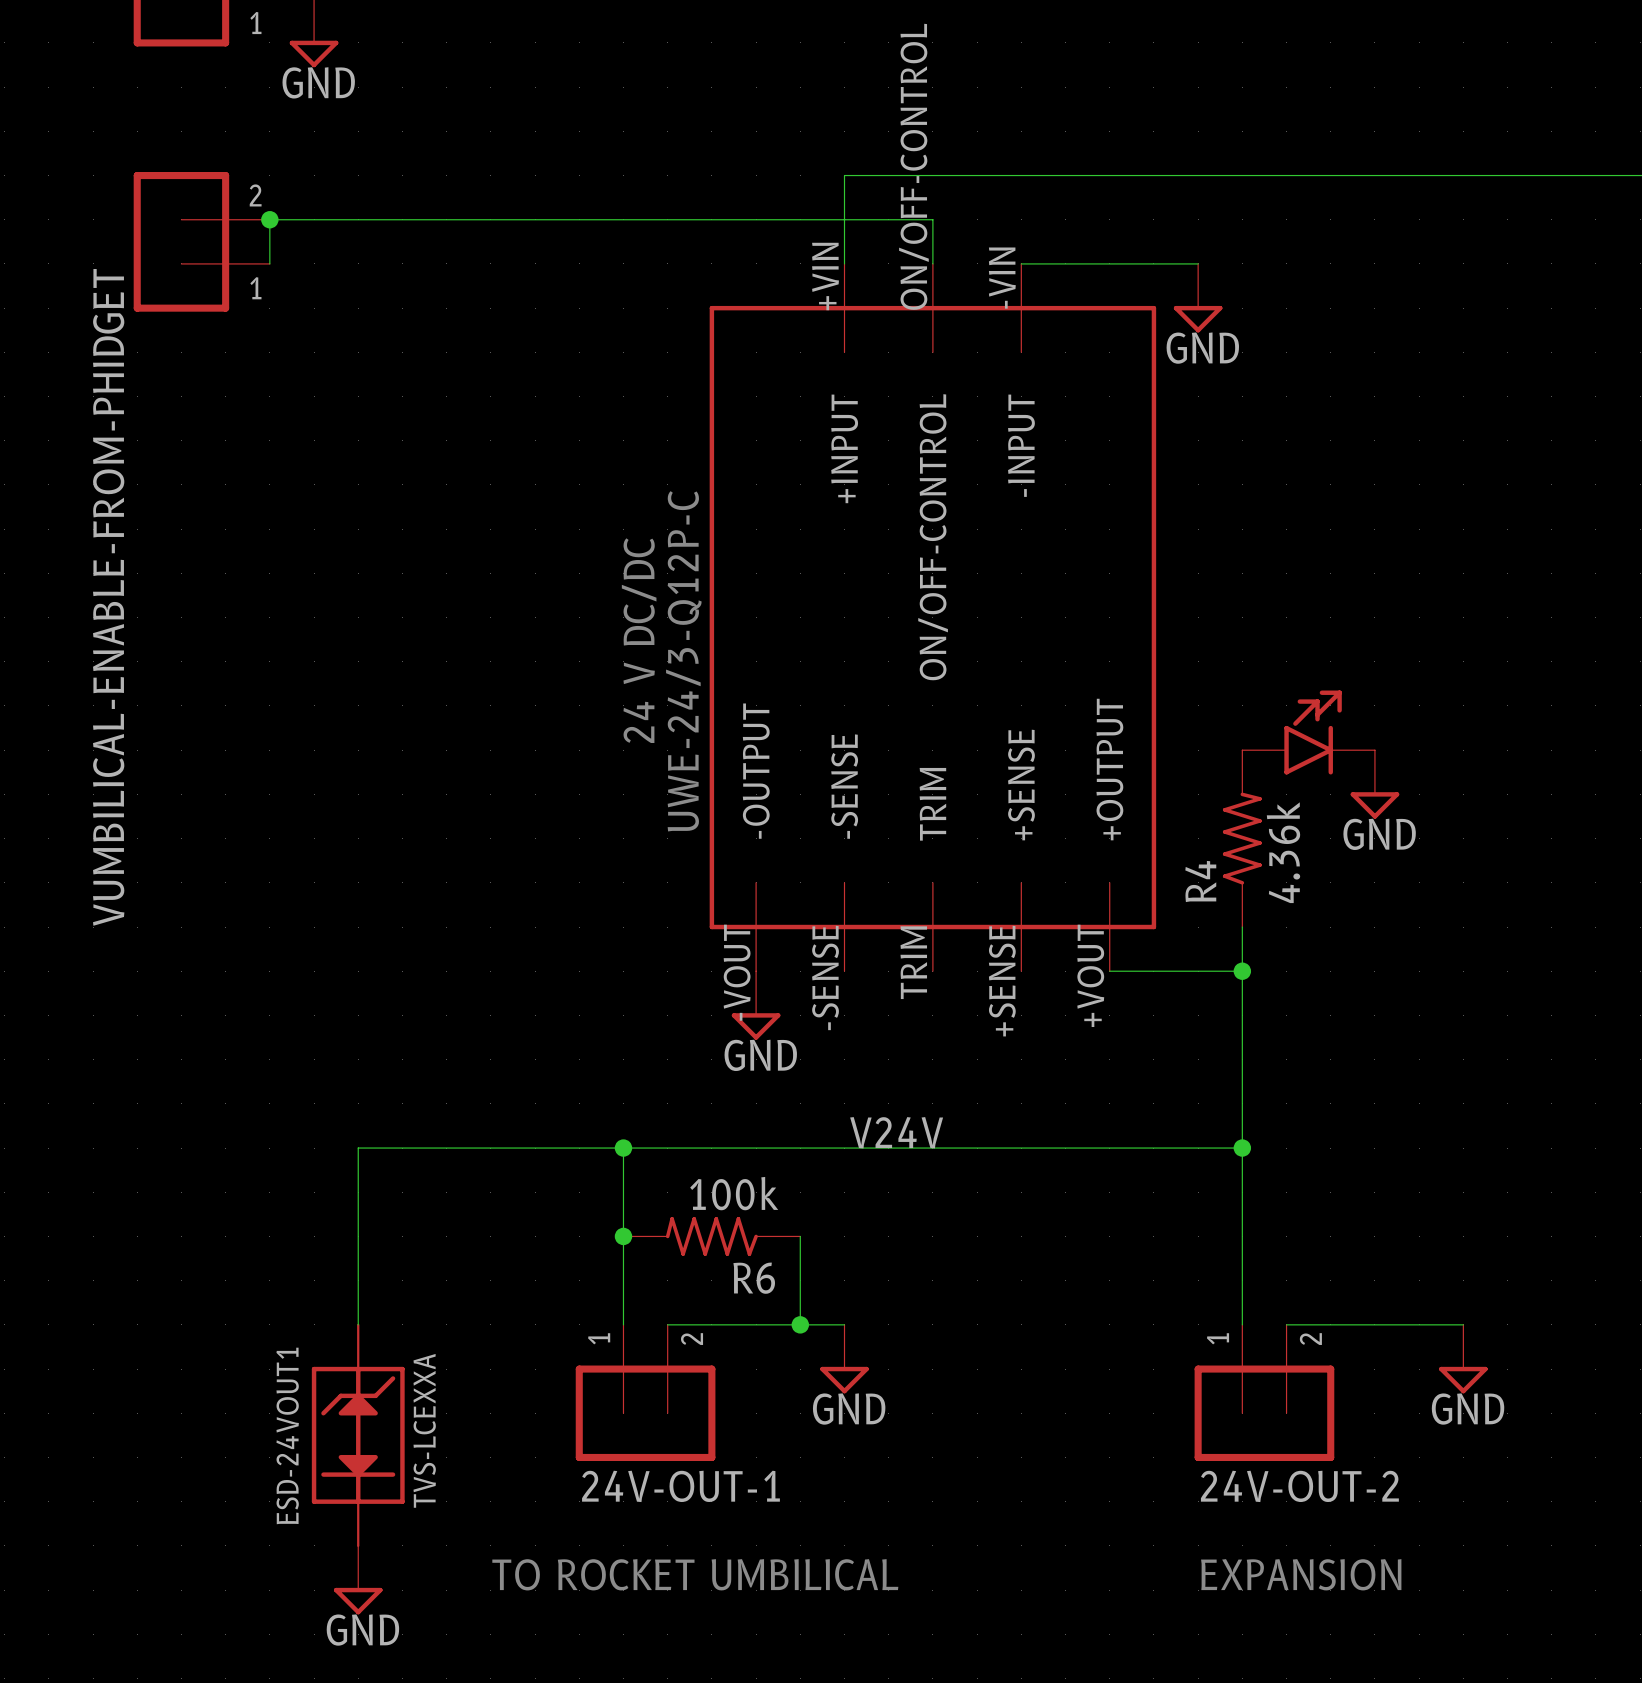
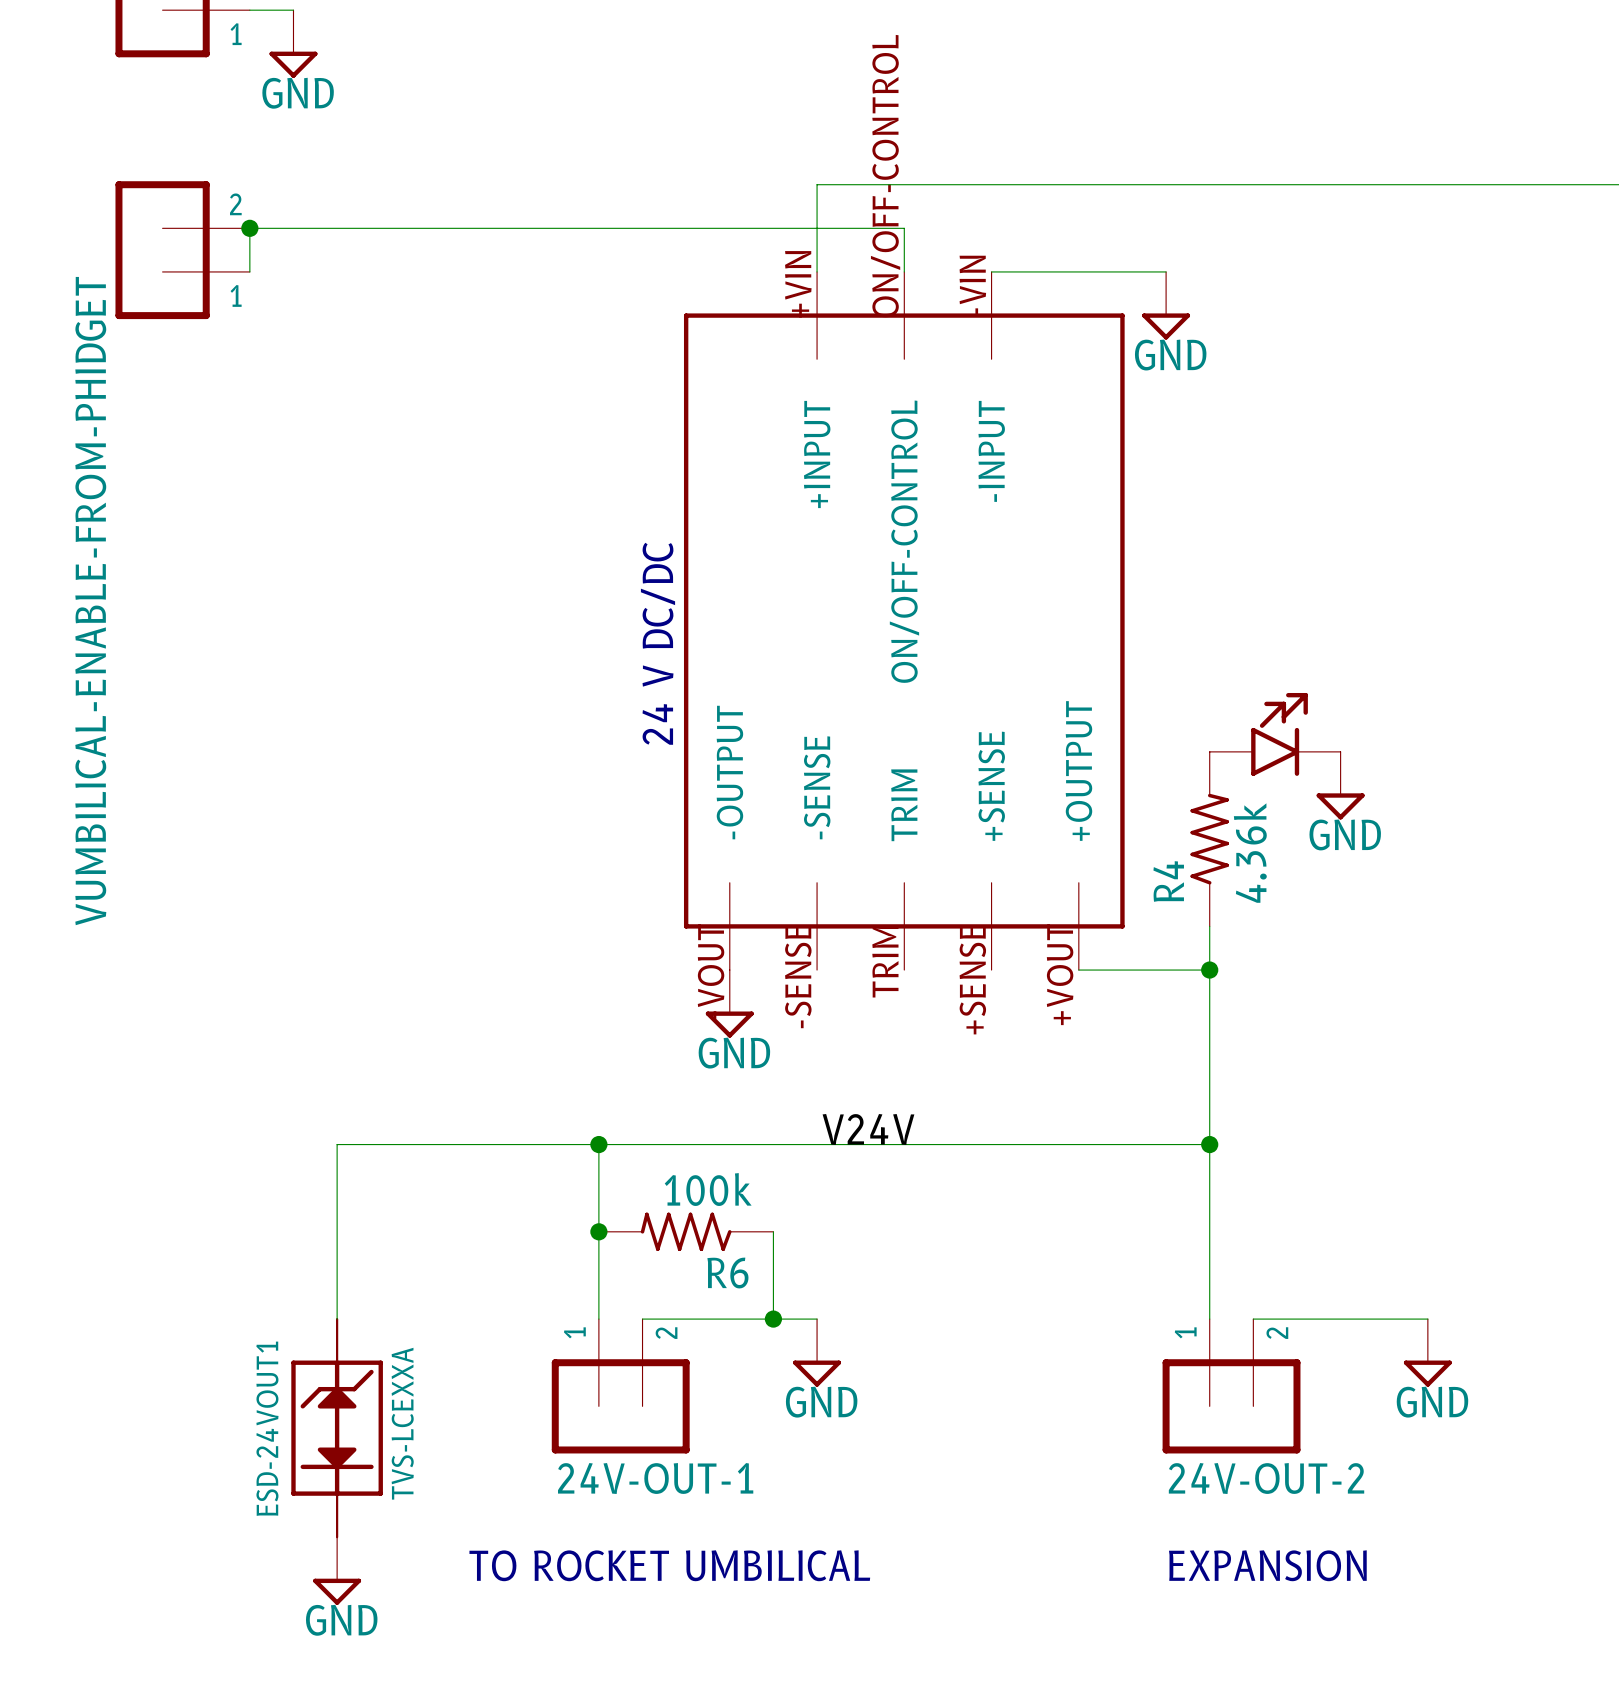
text position: 24 V DC/DC (639, 640) -> 24 V DC/DC (658, 643)
text: UWE-24/3-Q12P-C (683, 661) -> none

